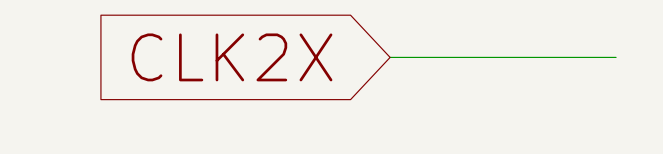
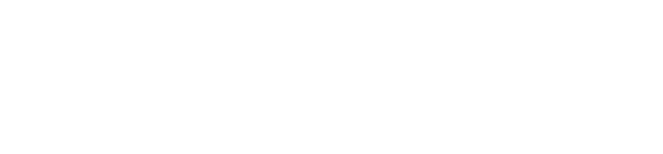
global label: CLK2X (232, 57) -> none
wire: (390, 57) (616, 57) -> none

